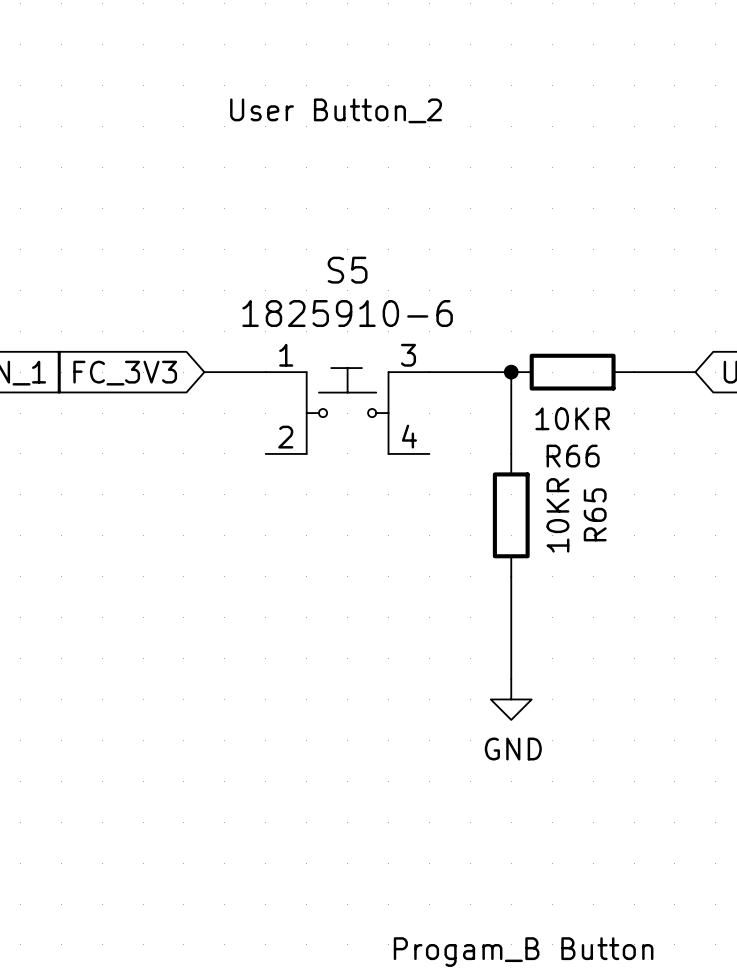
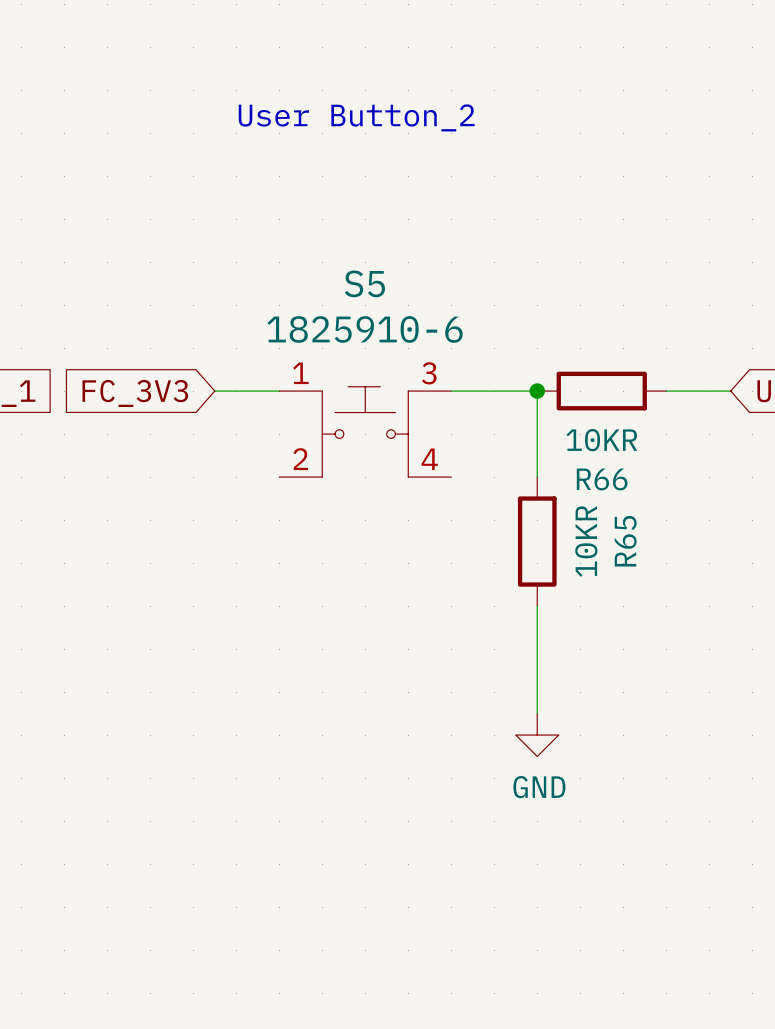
text: Progam_B Button (523, 952) -> none

